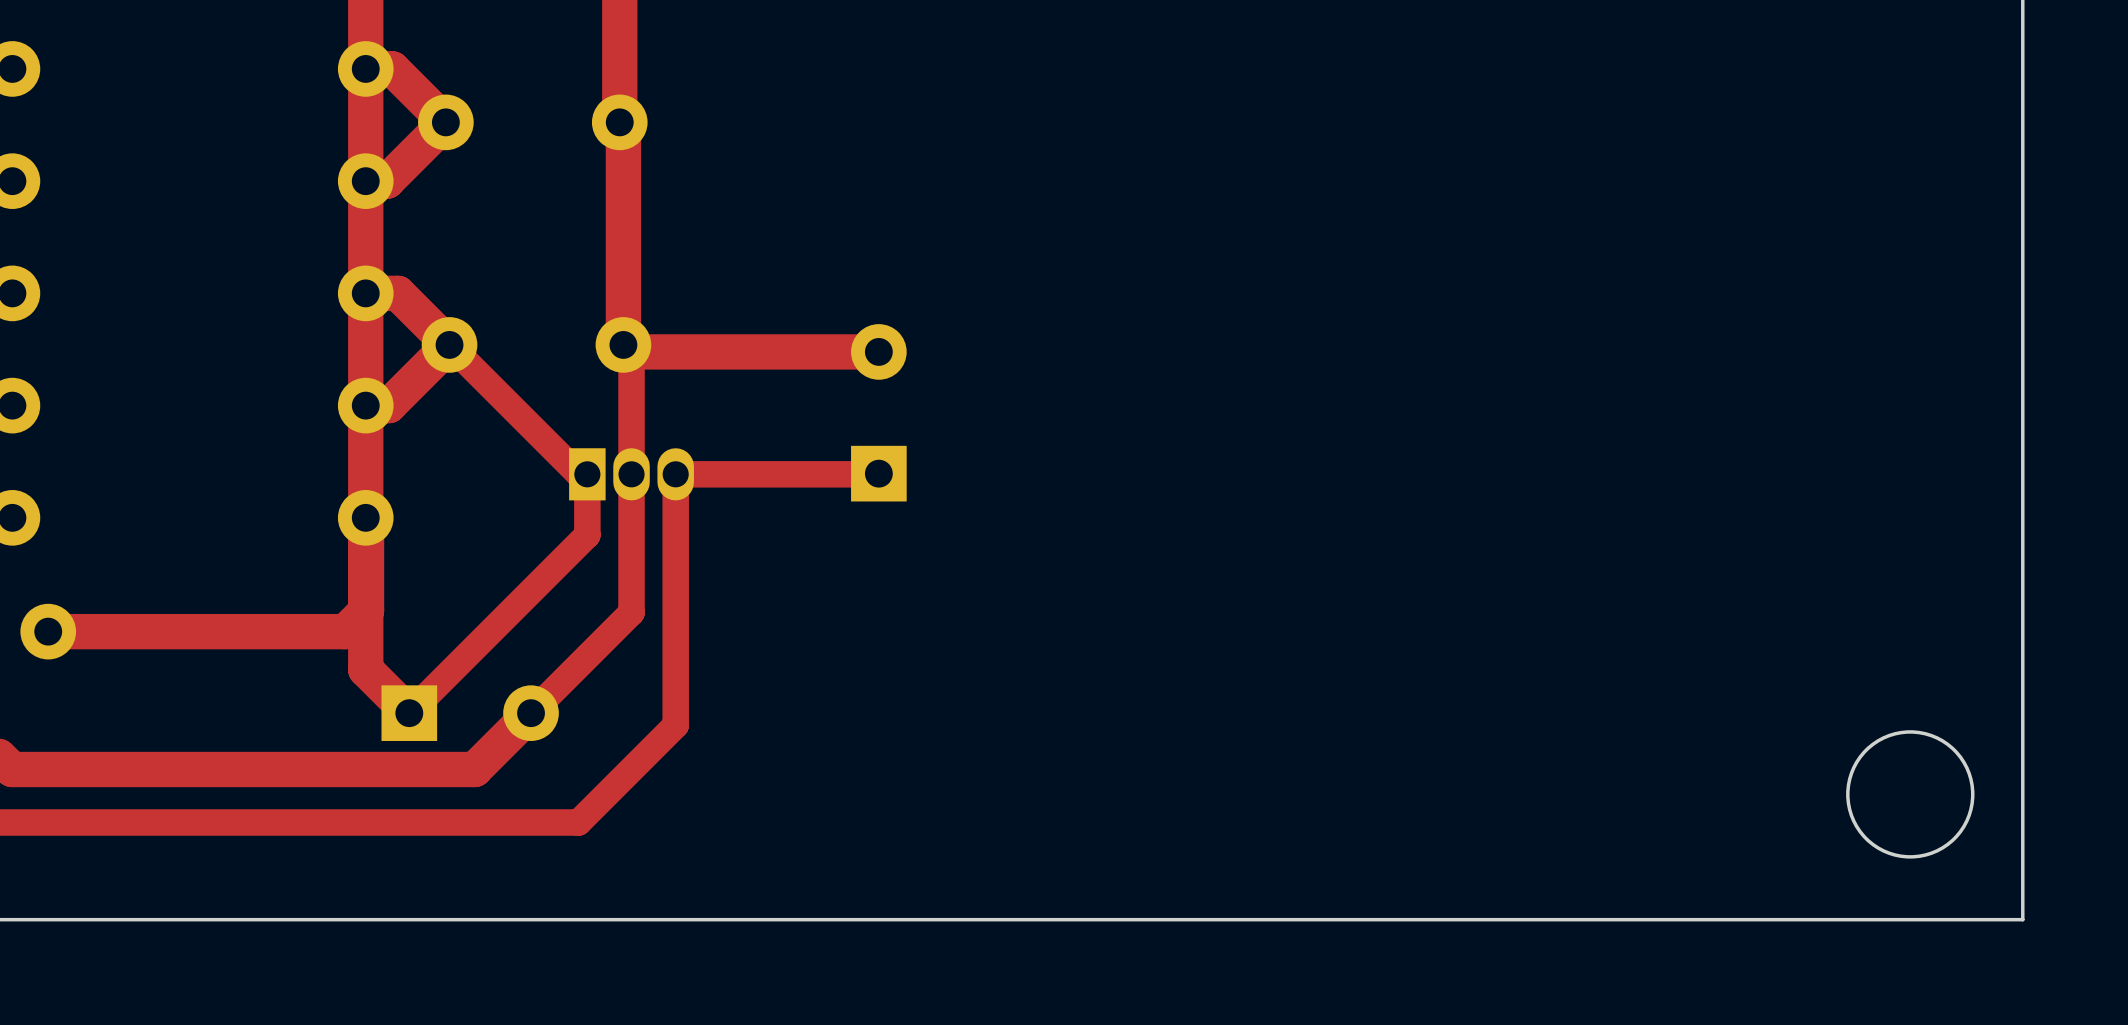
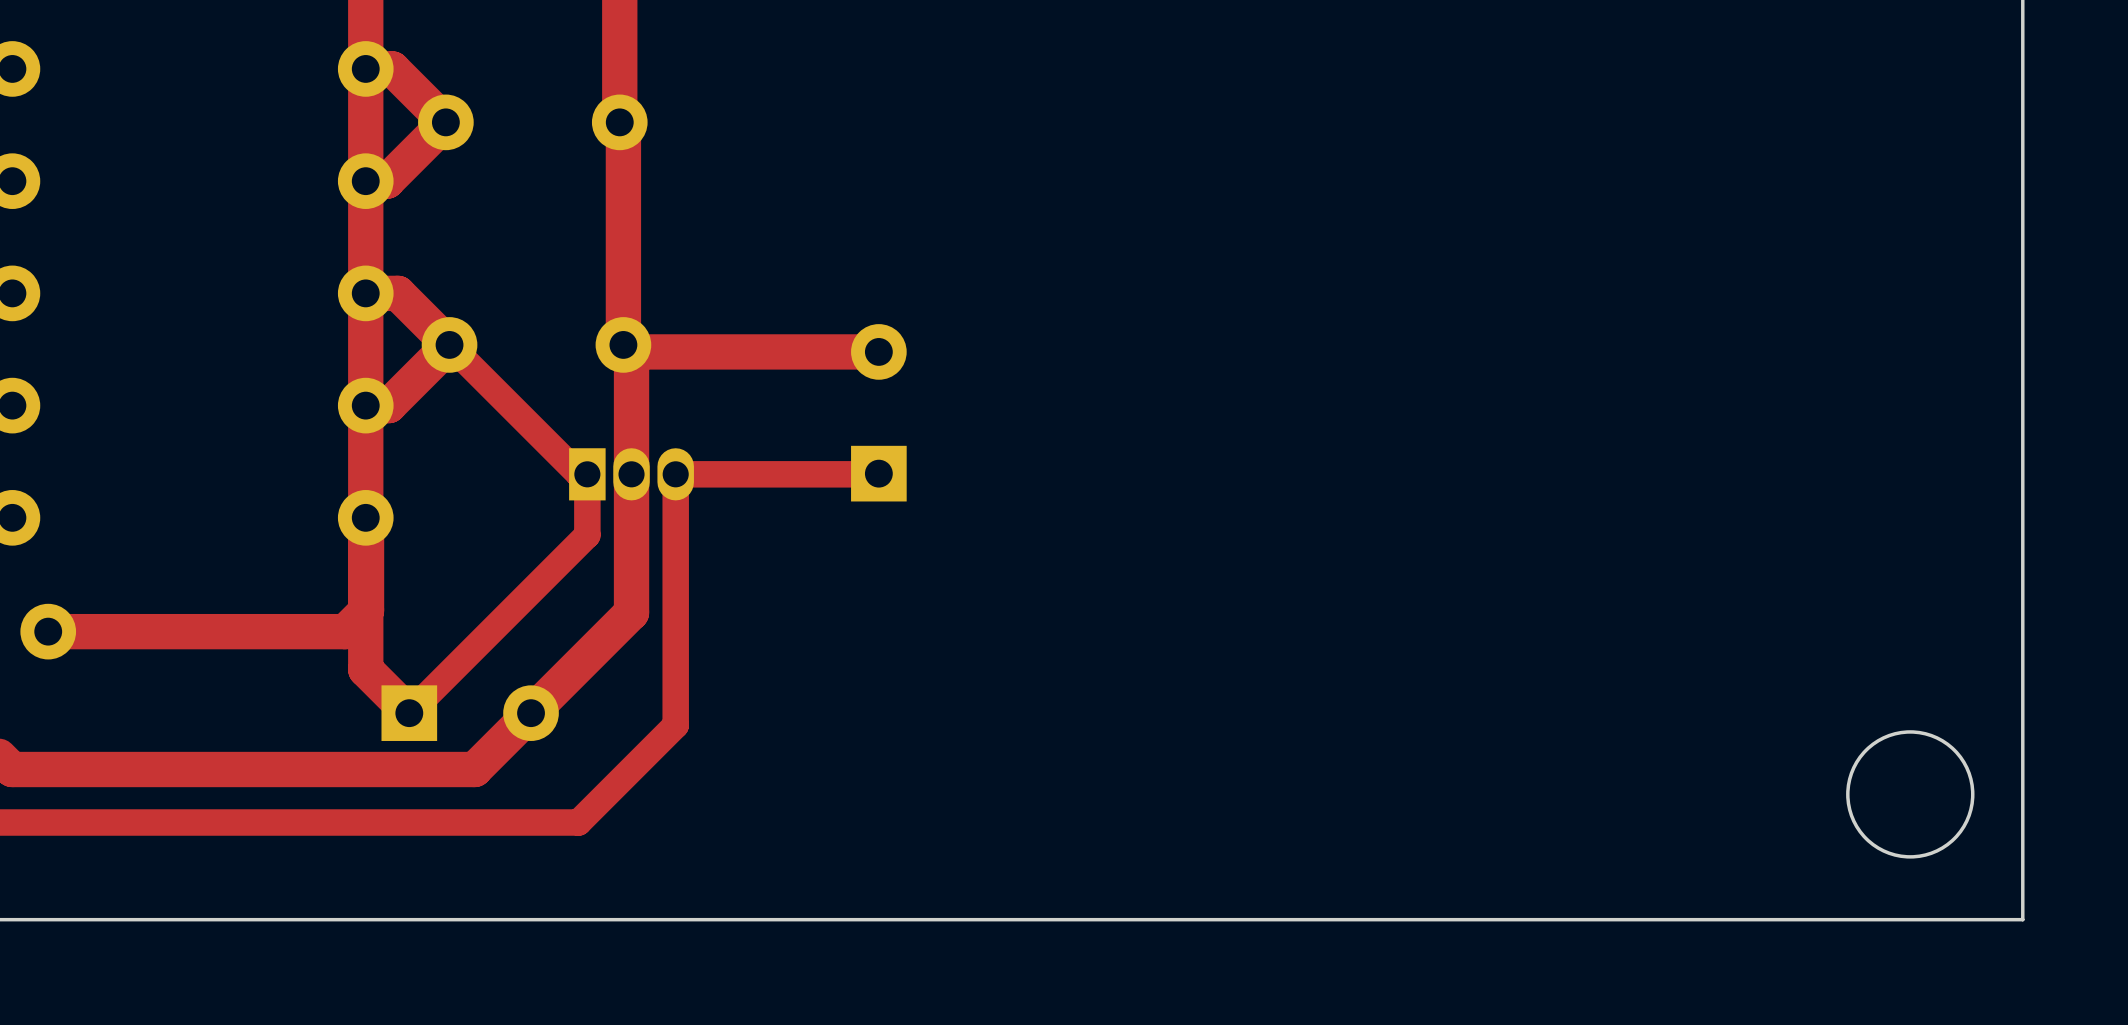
top track width: thin (623, 344) (631, 353) (631, 612) (531, 713) -> thick (623, 344) (631, 353) (631, 612) (531, 713)

